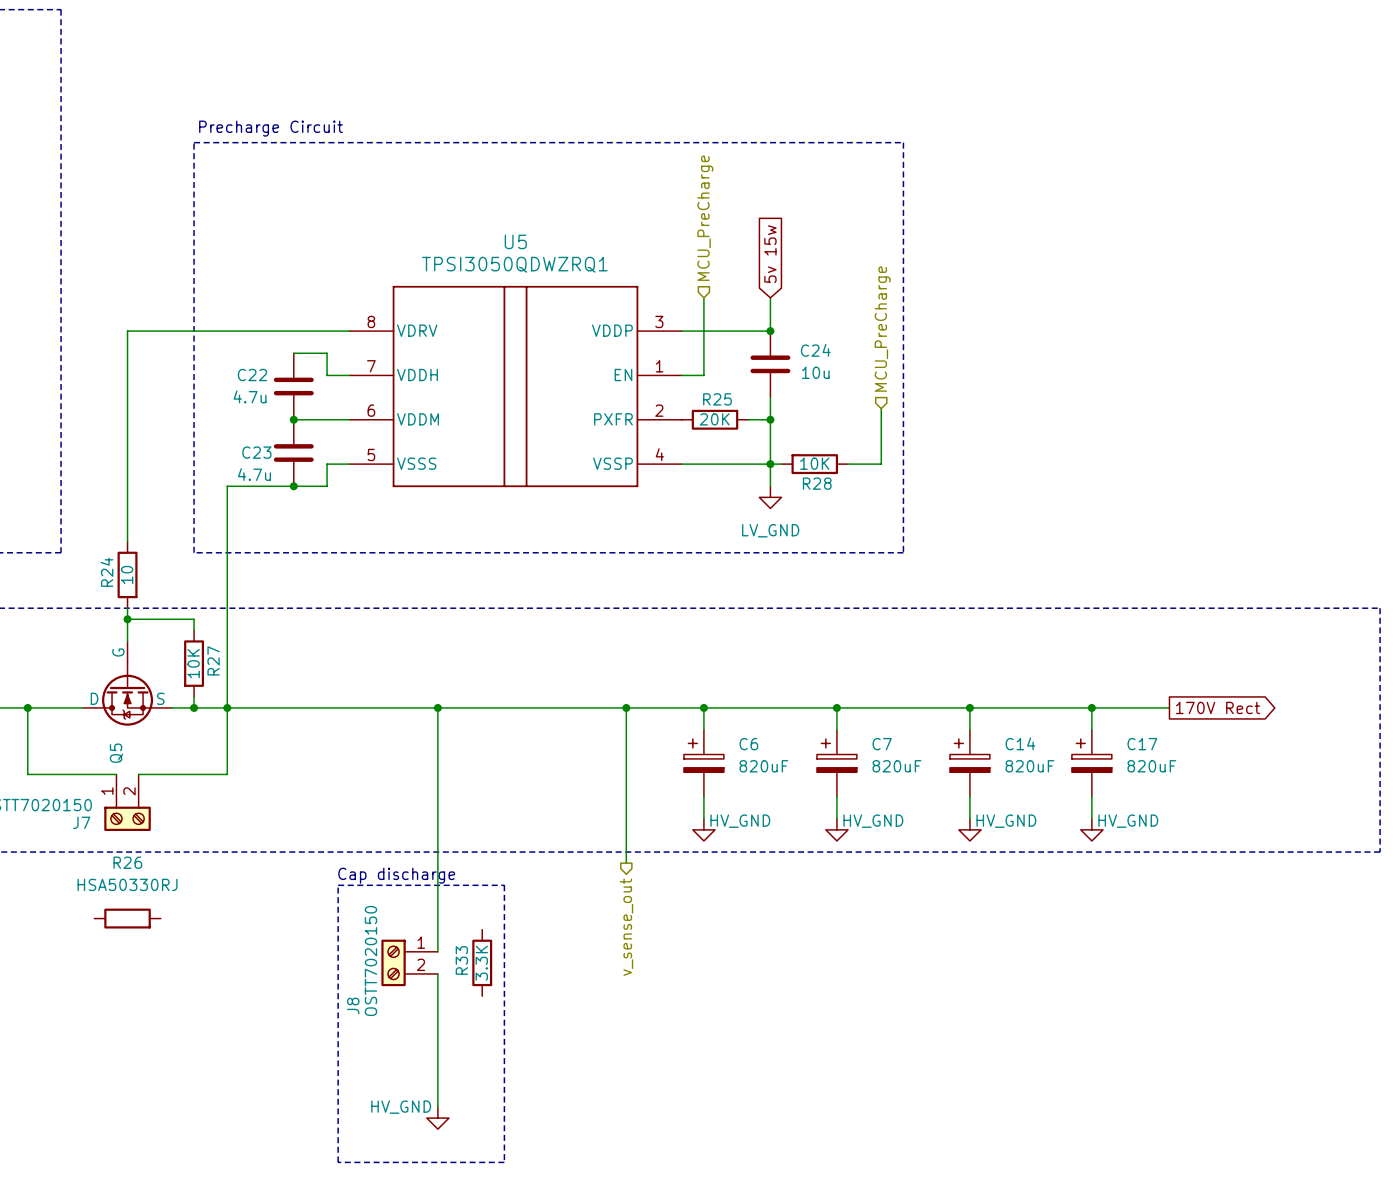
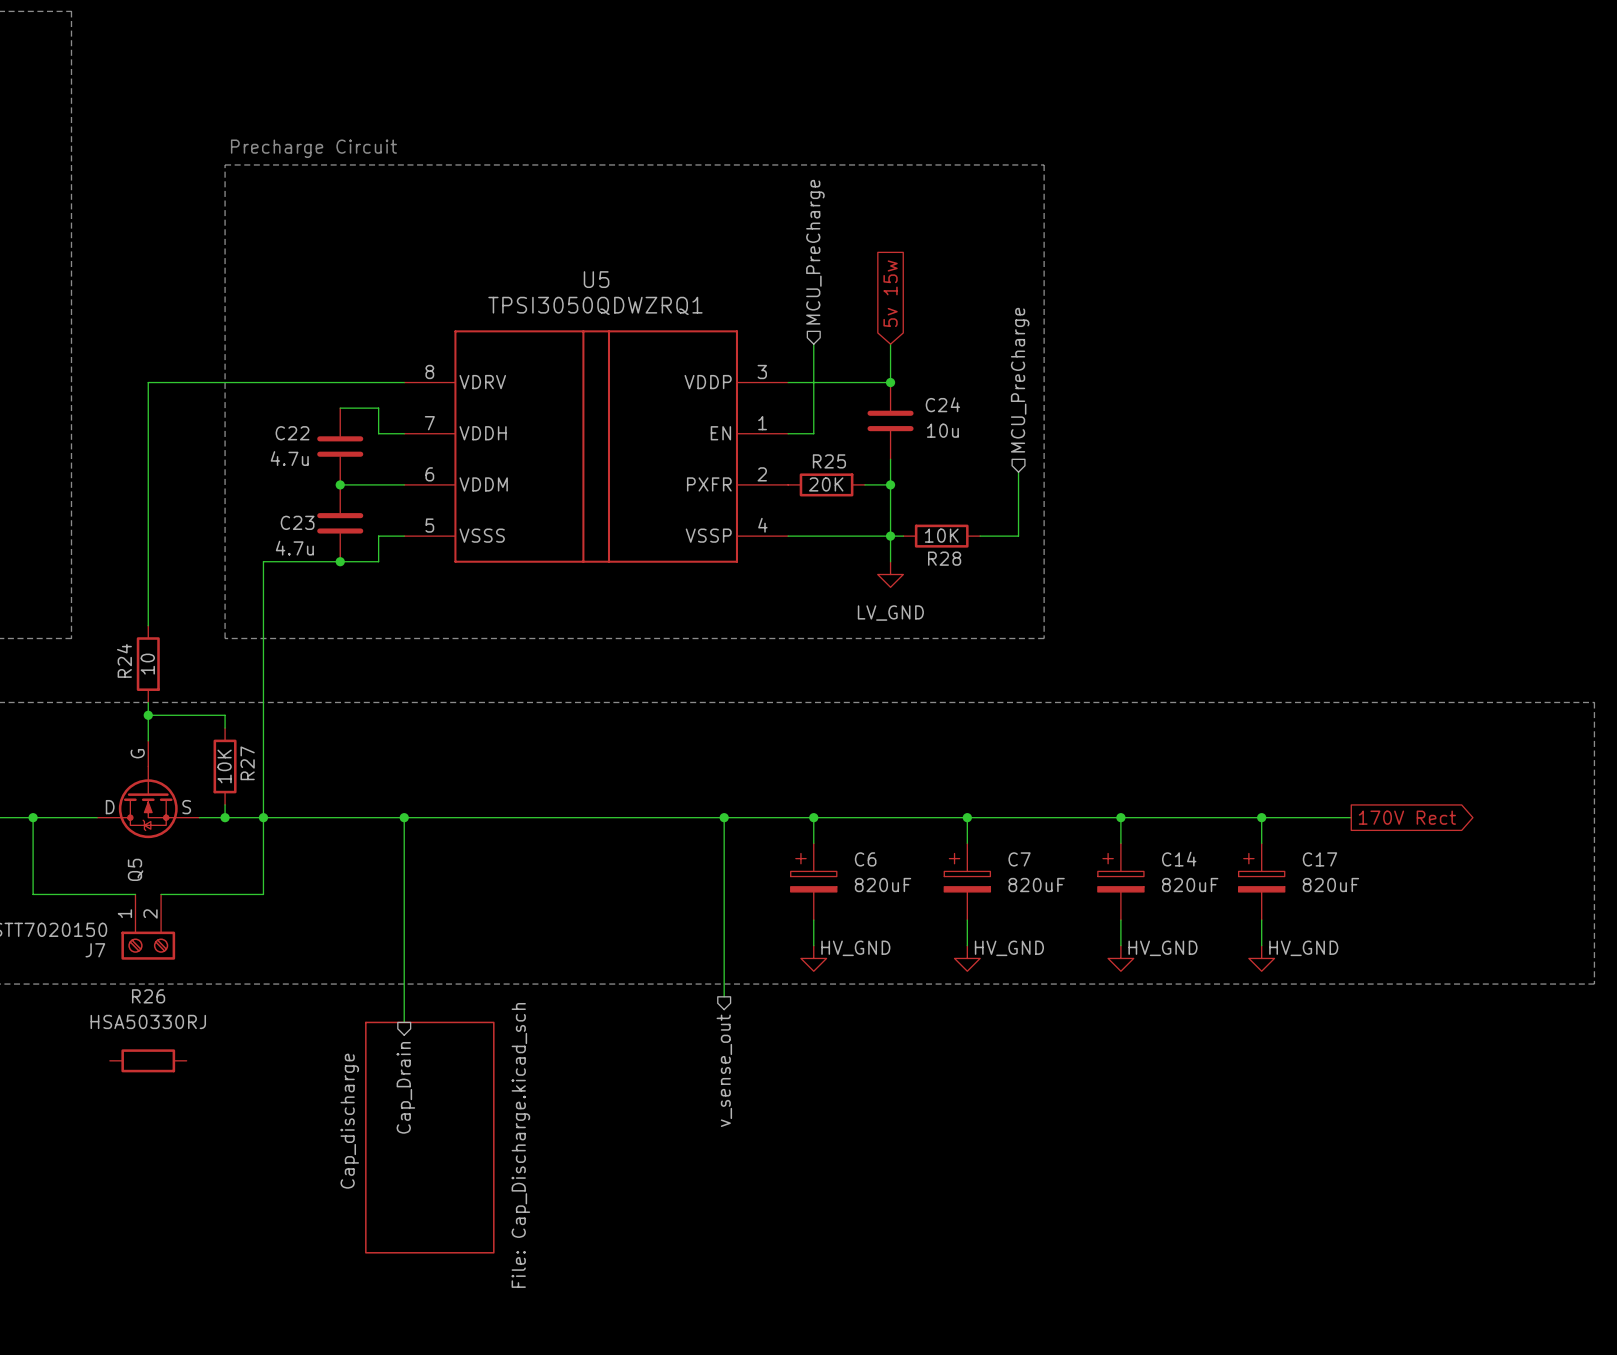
wire: none -> (404, 817) (404, 1022)
junction: none -> (404, 817)
wire: (437, 707) (437, 951) -> none
junction: (437, 707) -> none
text: Cap discharge (396, 875) -> none
line: (338, 885) (504, 885) (504, 1162) (338, 1162) (338, 885) -> none
sheet pin: none -> Cap_Drain (405, 1087)
J8: OSTT7020150 (409, 962) -> none
R33: (482, 962) -> none
wire: (437, 973) (437, 1107) -> none
sheet Cap_discharge: none -> File: Cap_Discharge.kicad_sch (429, 1137)
power symbol: HV_GND (437, 1118) -> none

